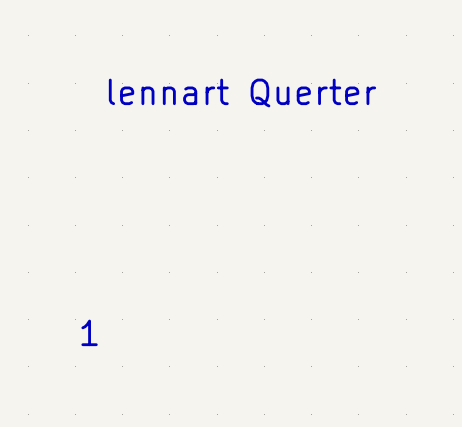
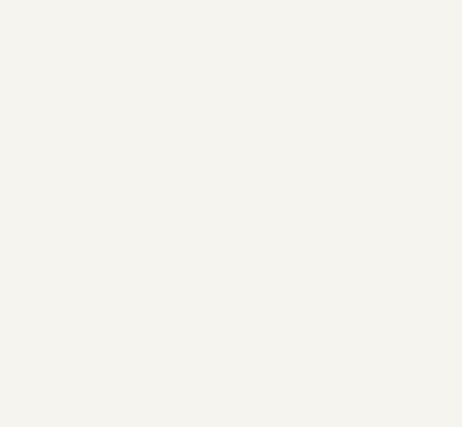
text: lennart Querter (242, 92) -> none
text: 1 (89, 332) -> none

